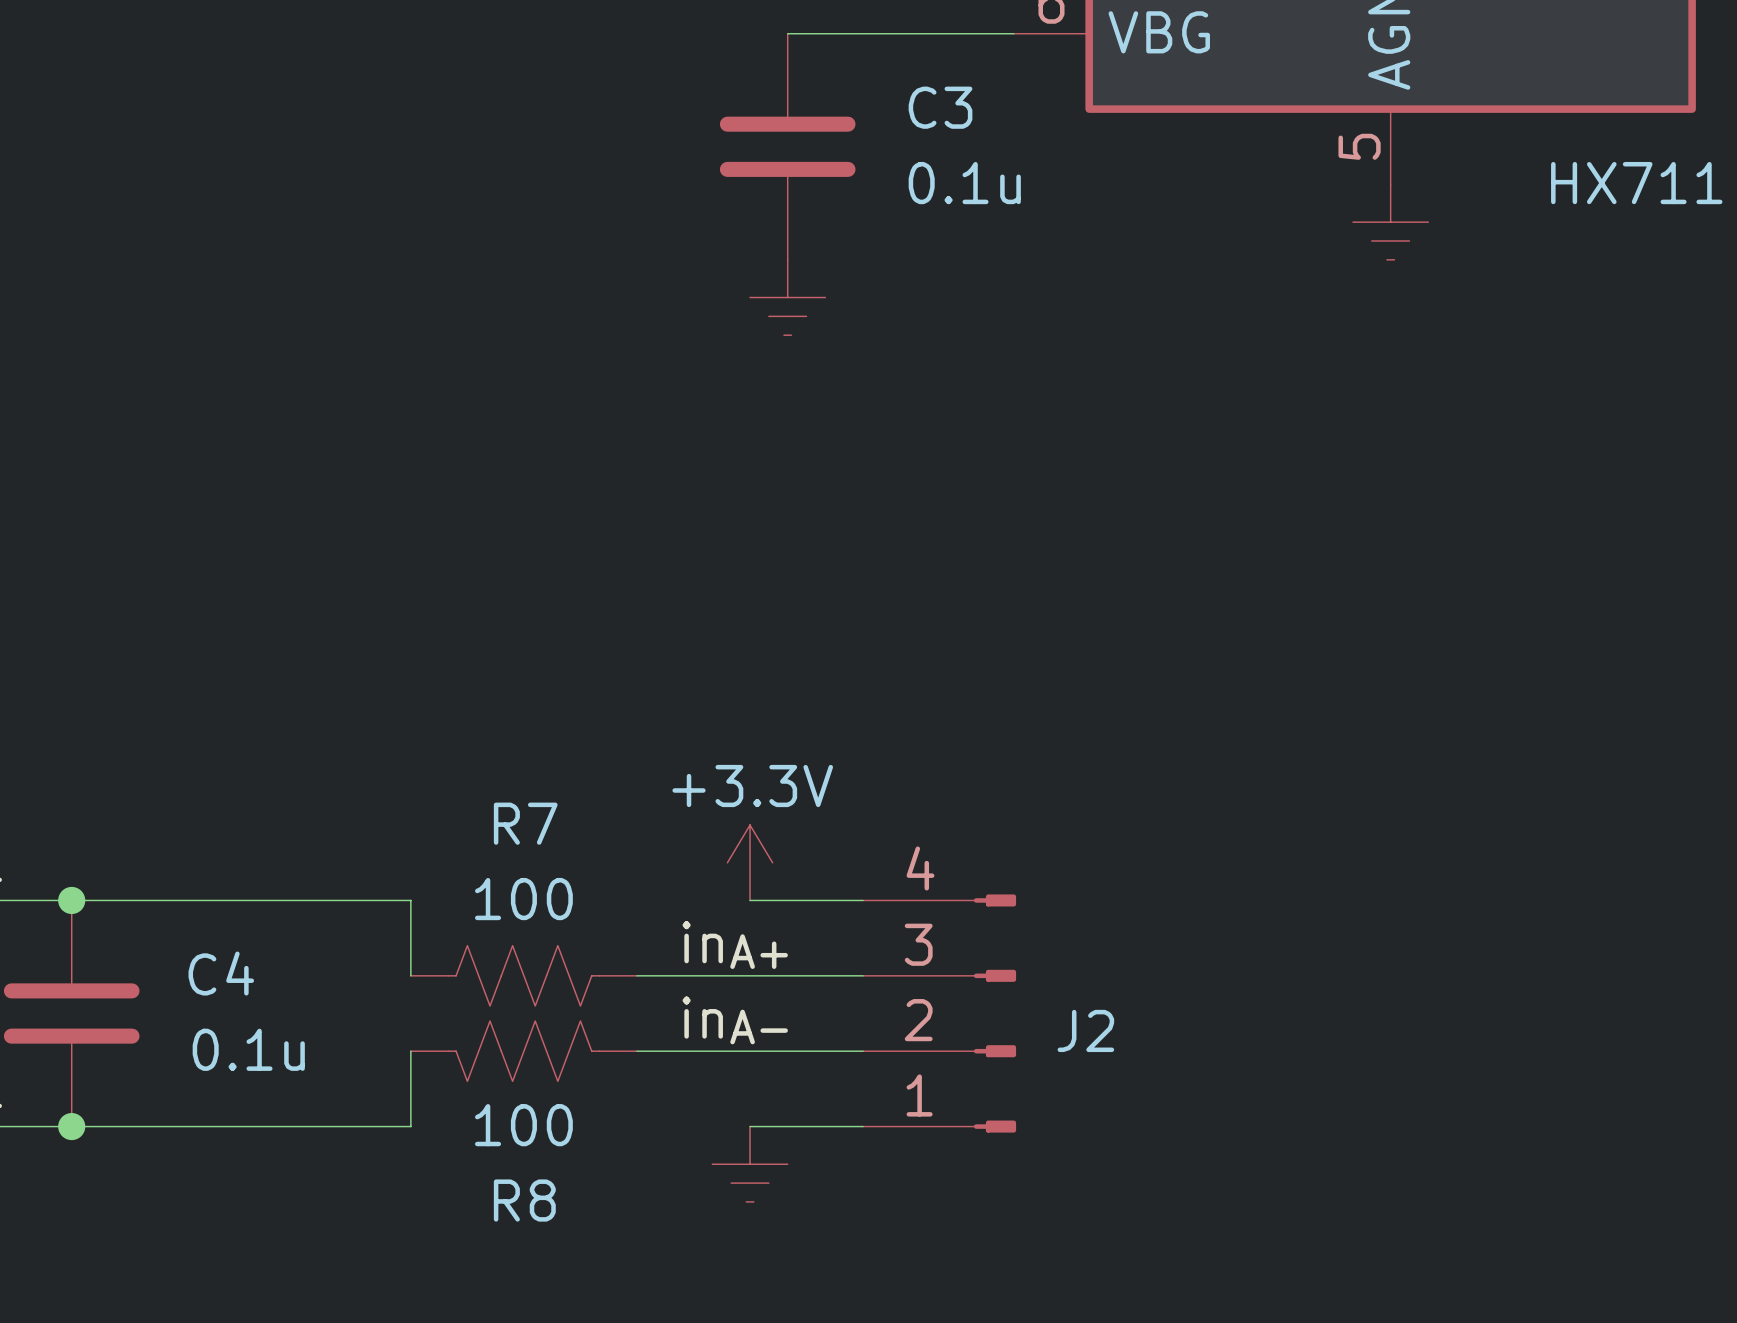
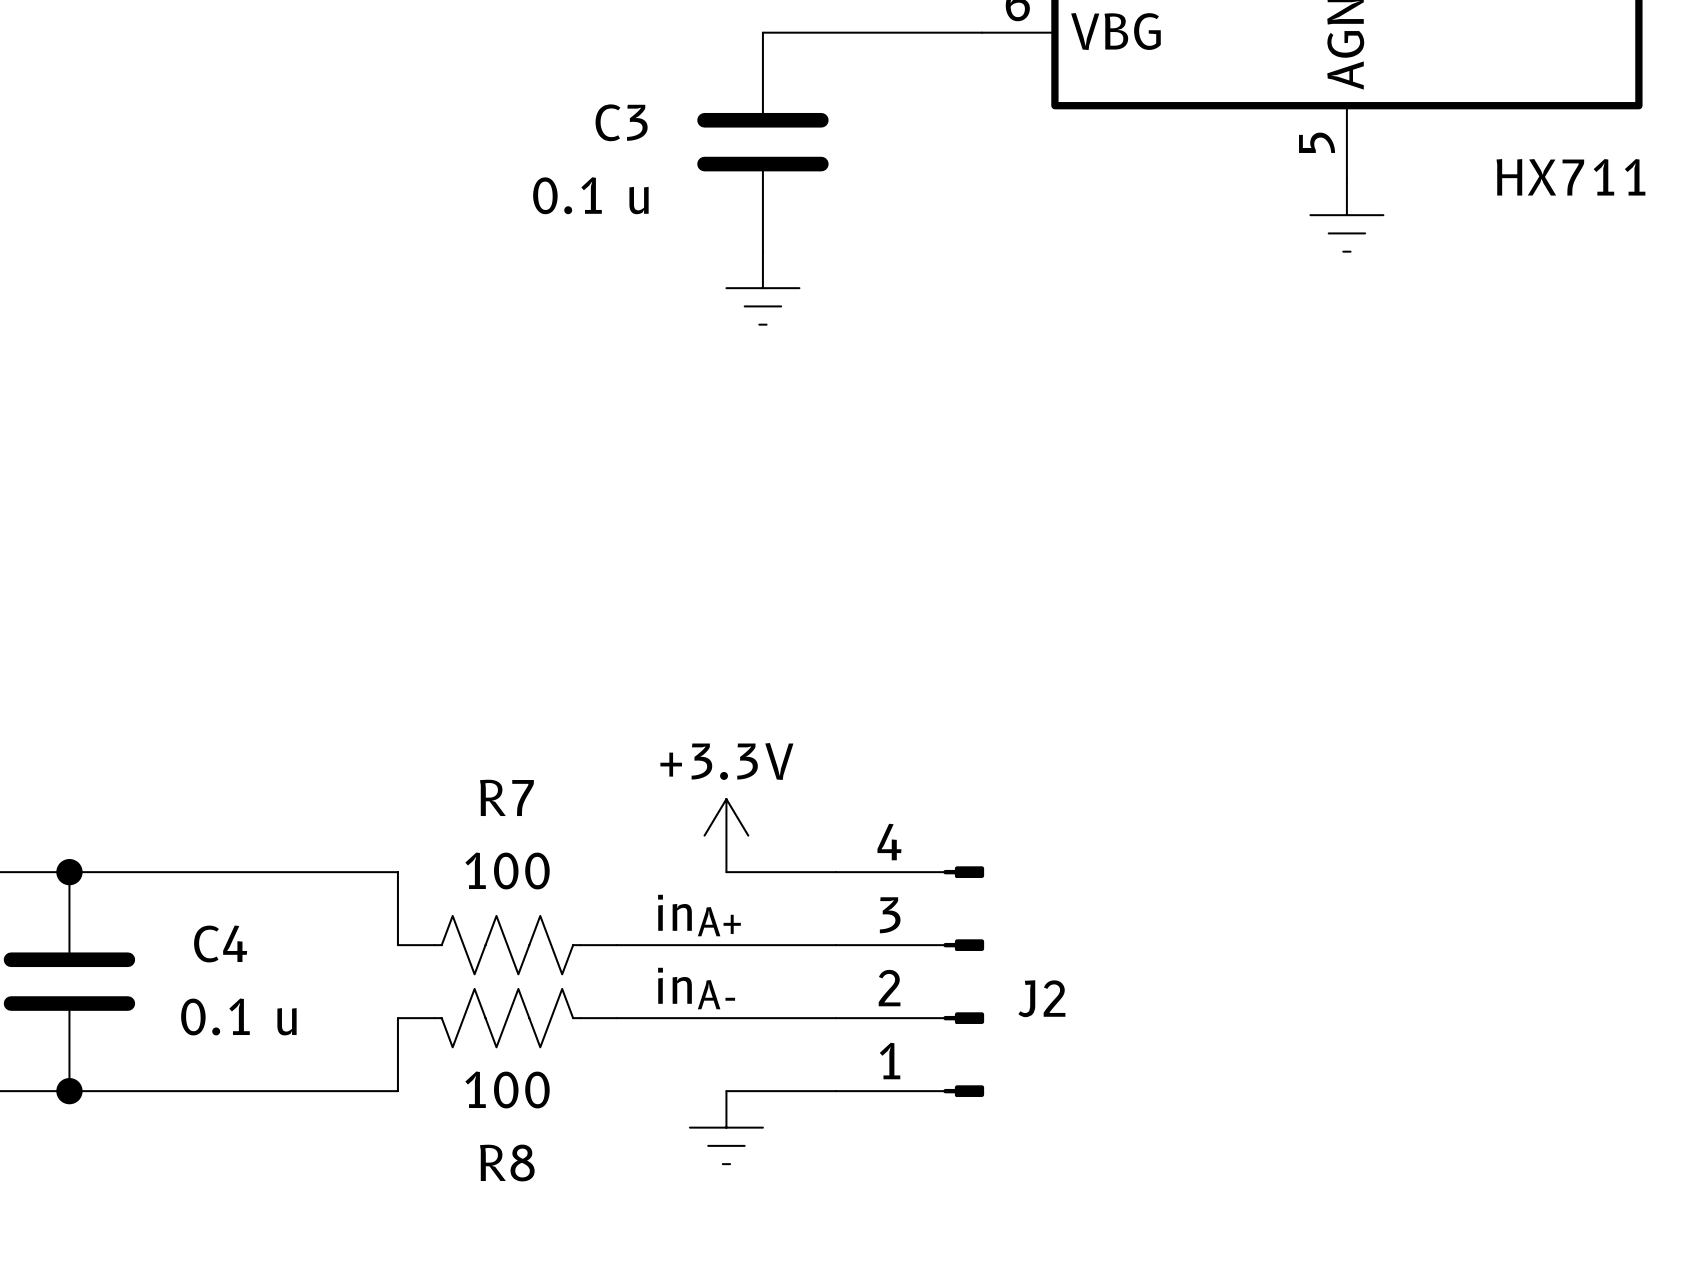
C3 name position: C3 (940, 107) -> C3 (621, 122)
C3 value: 0.1u (964, 183) -> 0.1 u (590, 195)
C4 value: 0.1u (248, 1049) -> 0.1 u (238, 1016)

